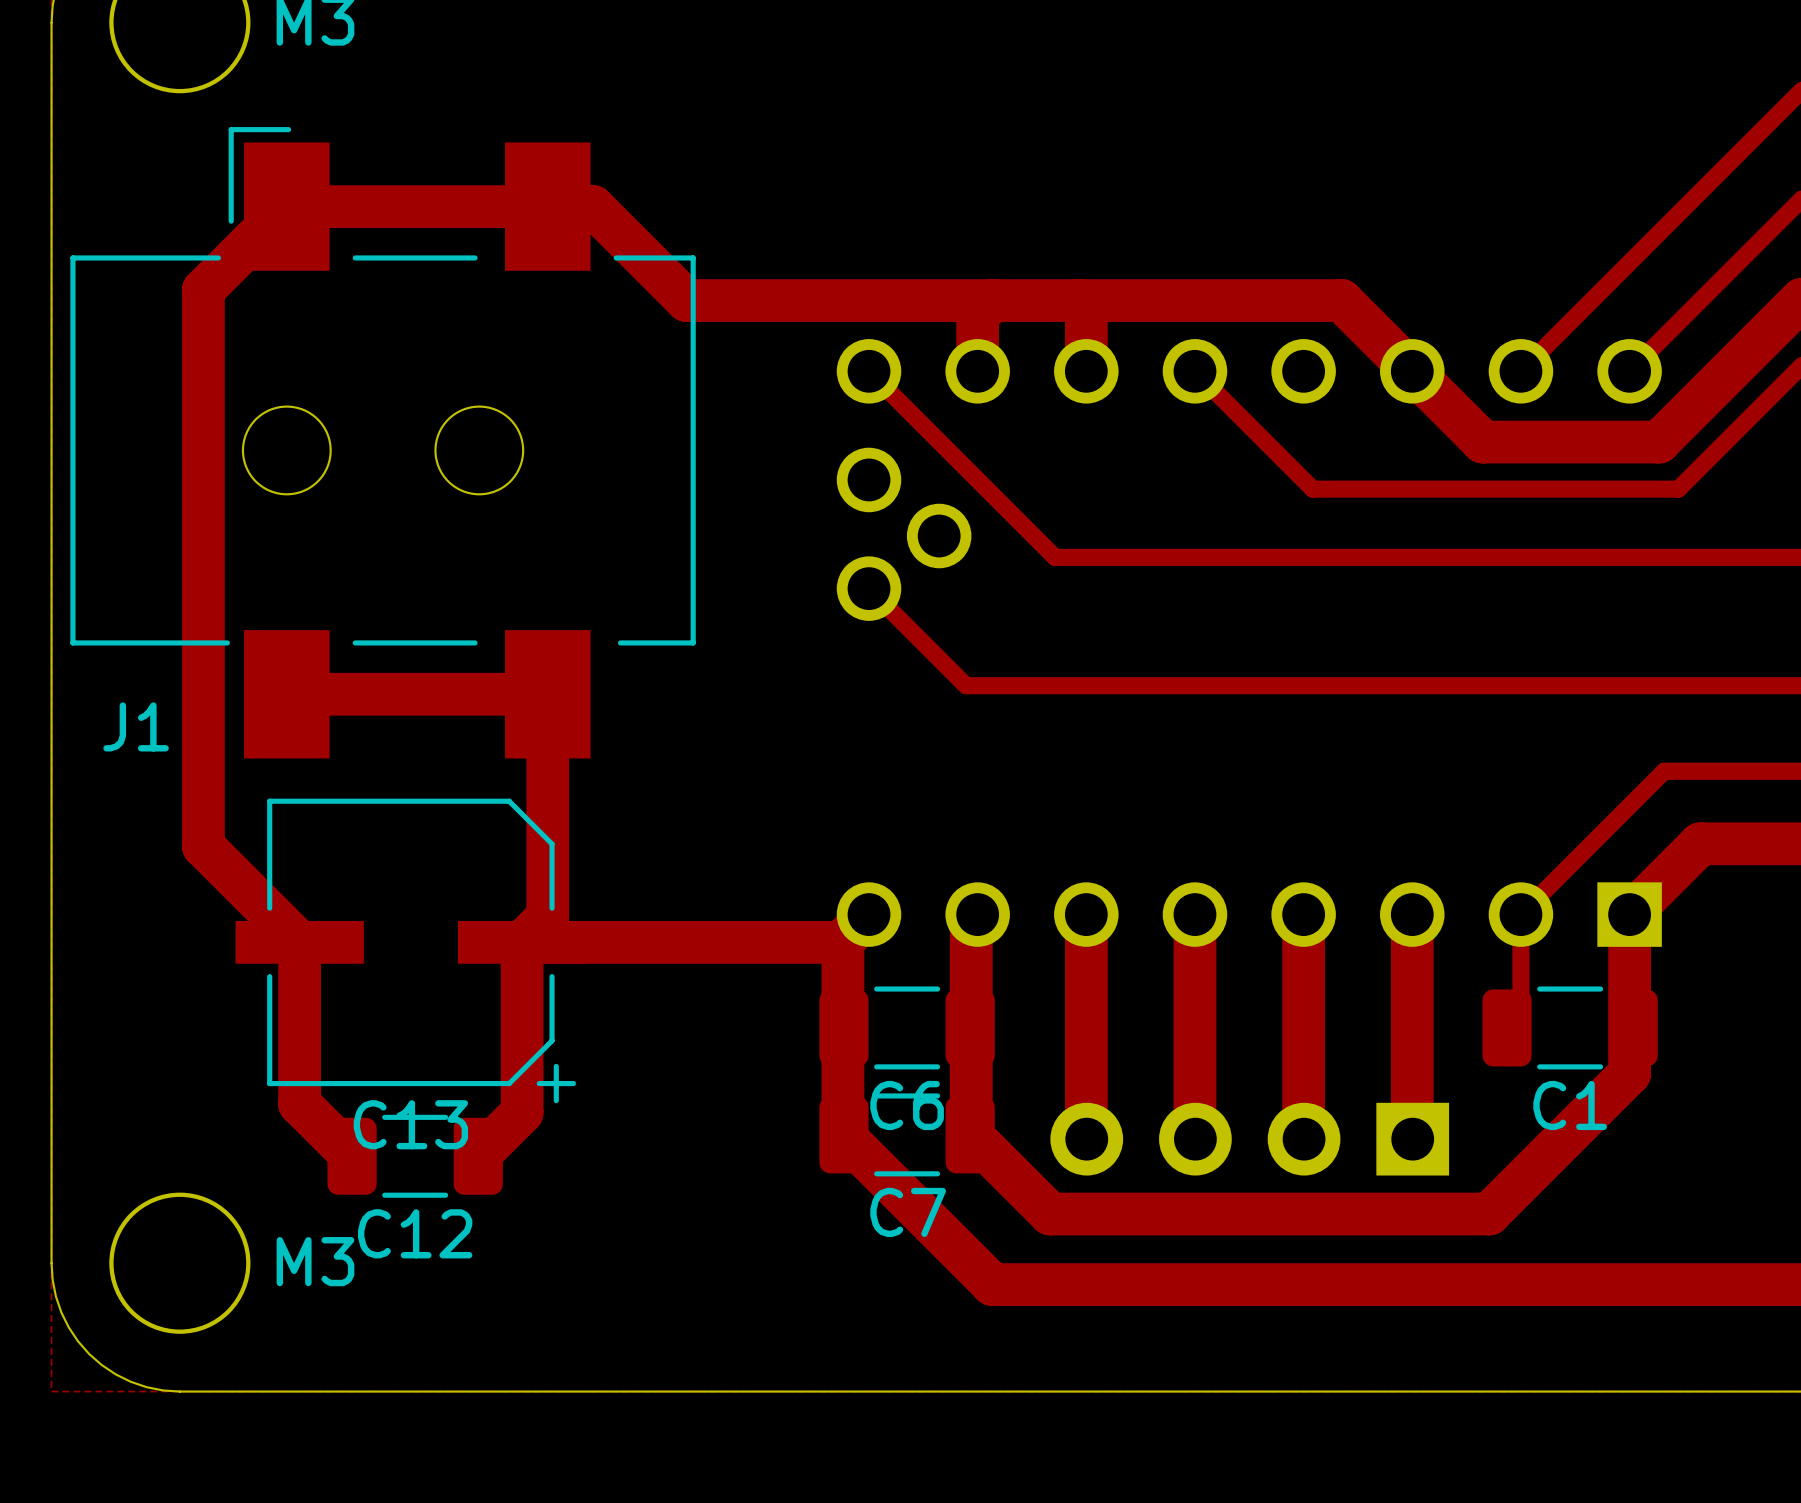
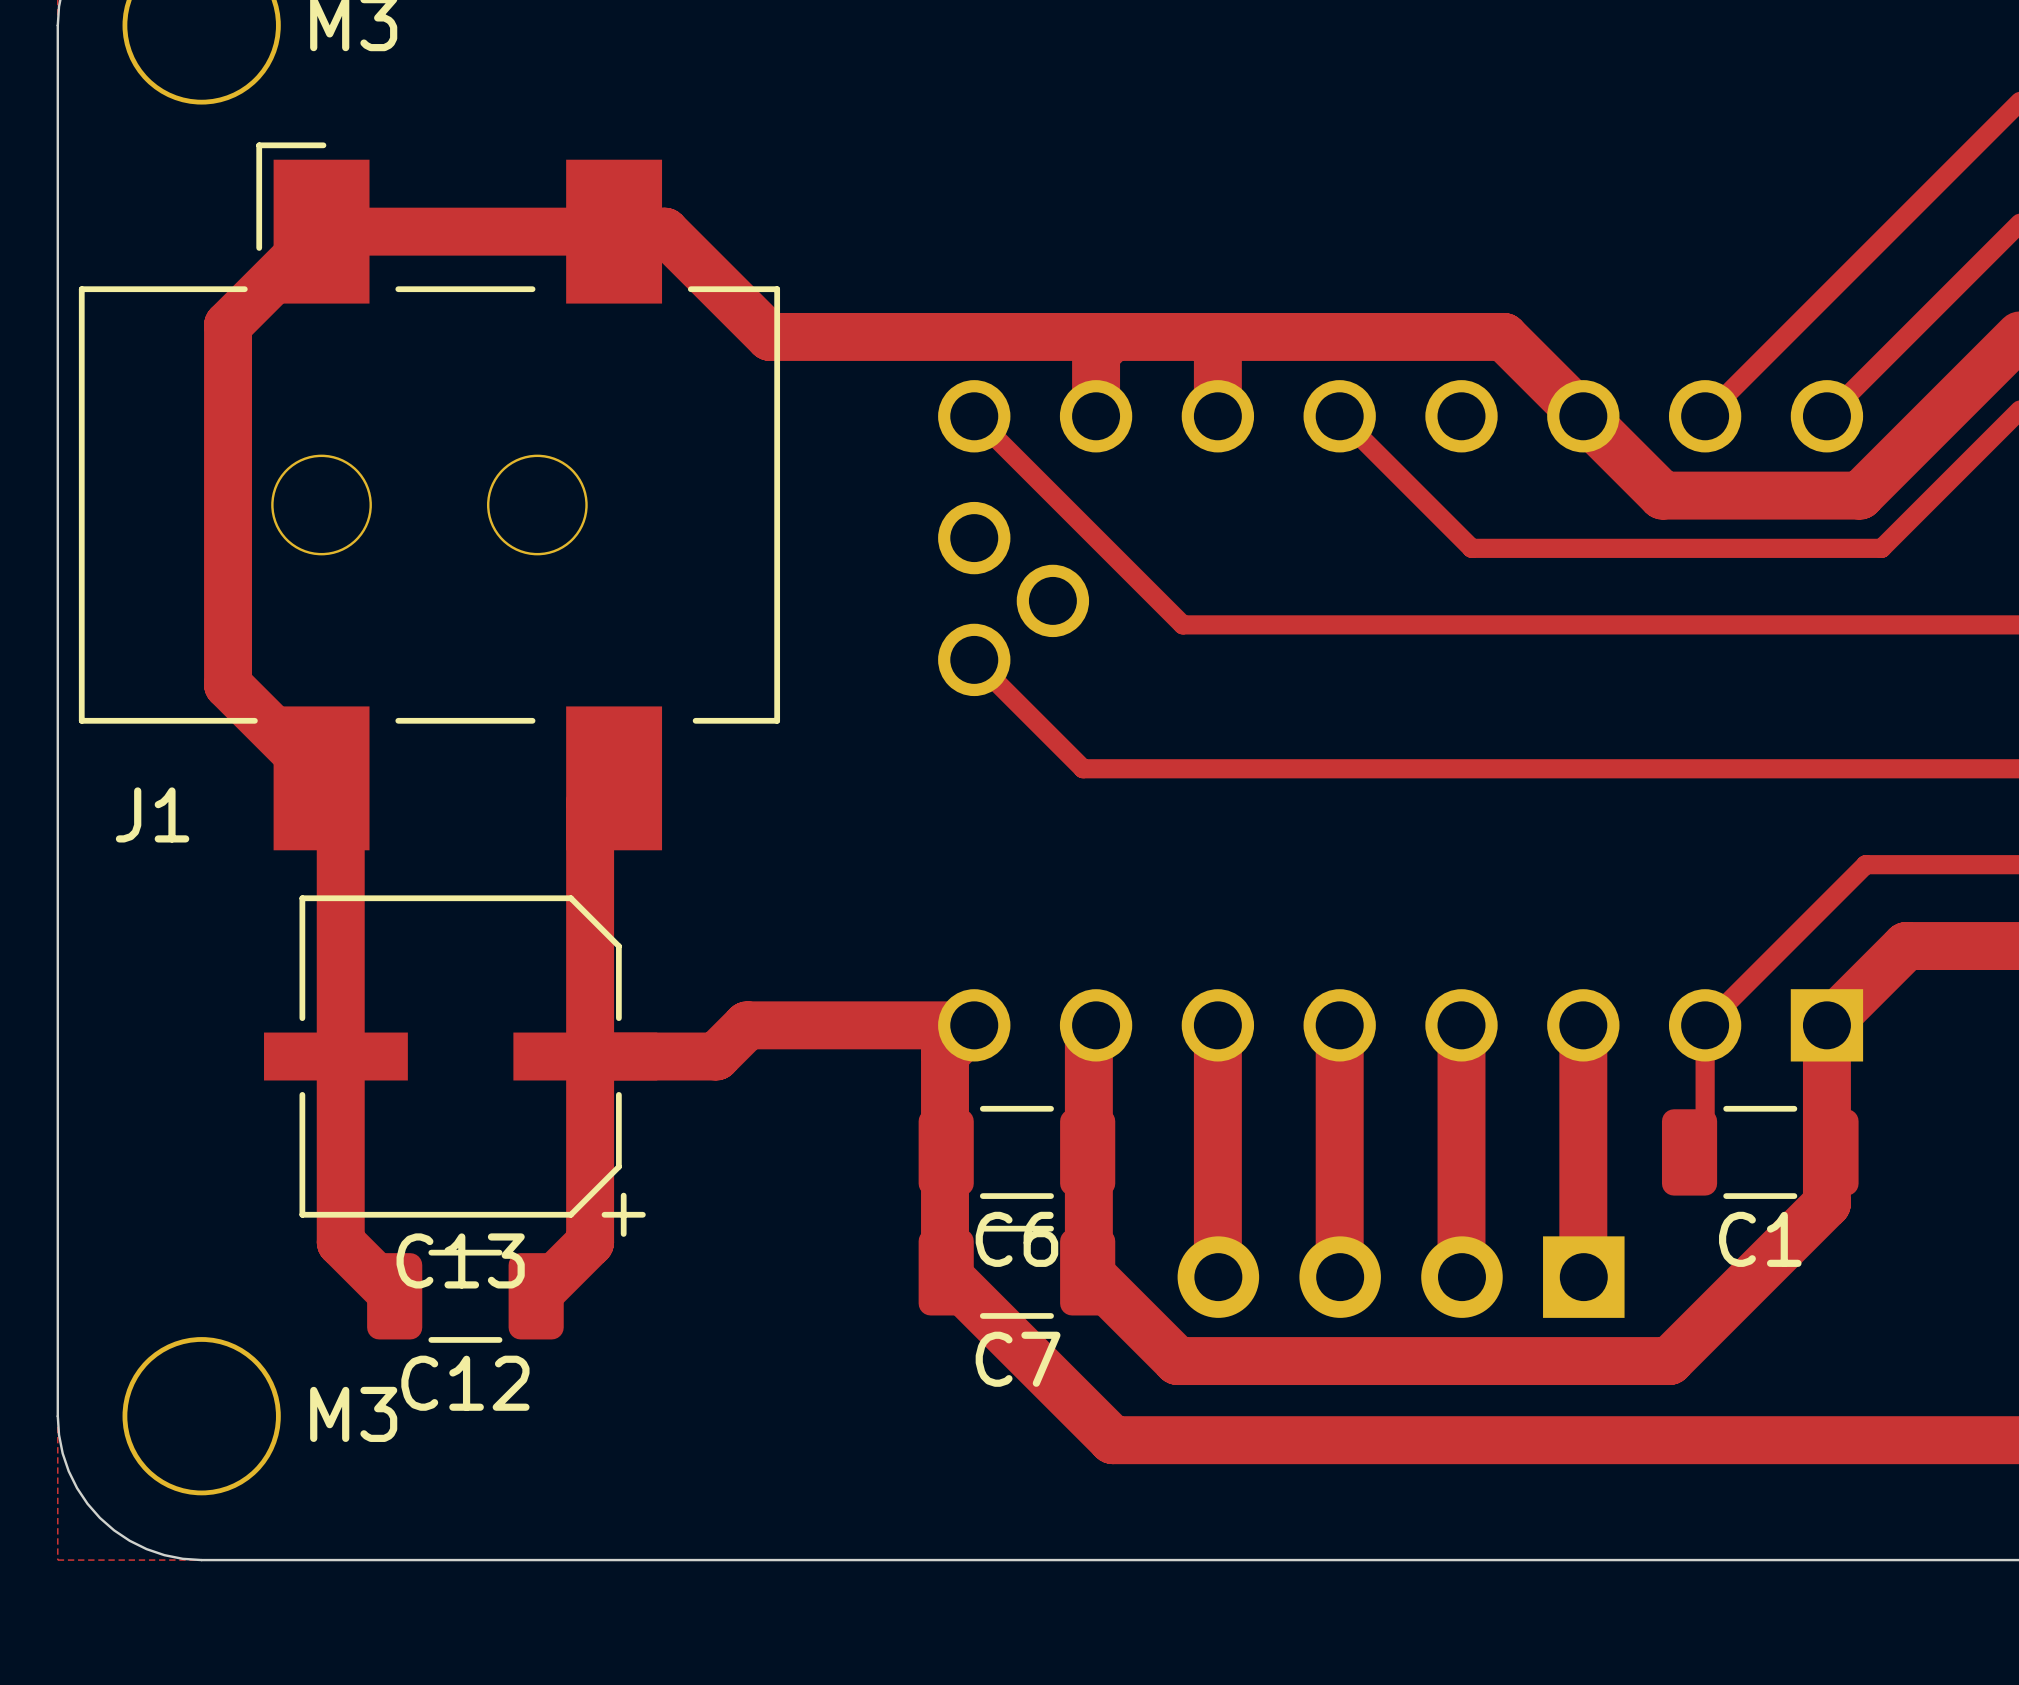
track: (203, 610) (203, 846) (299, 942) (299, 1103) (303, 1108) -> (228, 684) (340, 797) (340, 1242)
track: (286, 694) (547, 694) (547, 916) (522, 942) (522, 1112) -> (614, 778) (590, 802) (590, 1242) (585, 1247)
track: (842, 940) (841, 942) (638, 942) -> (974, 1025) (747, 1025) (716, 1056)

